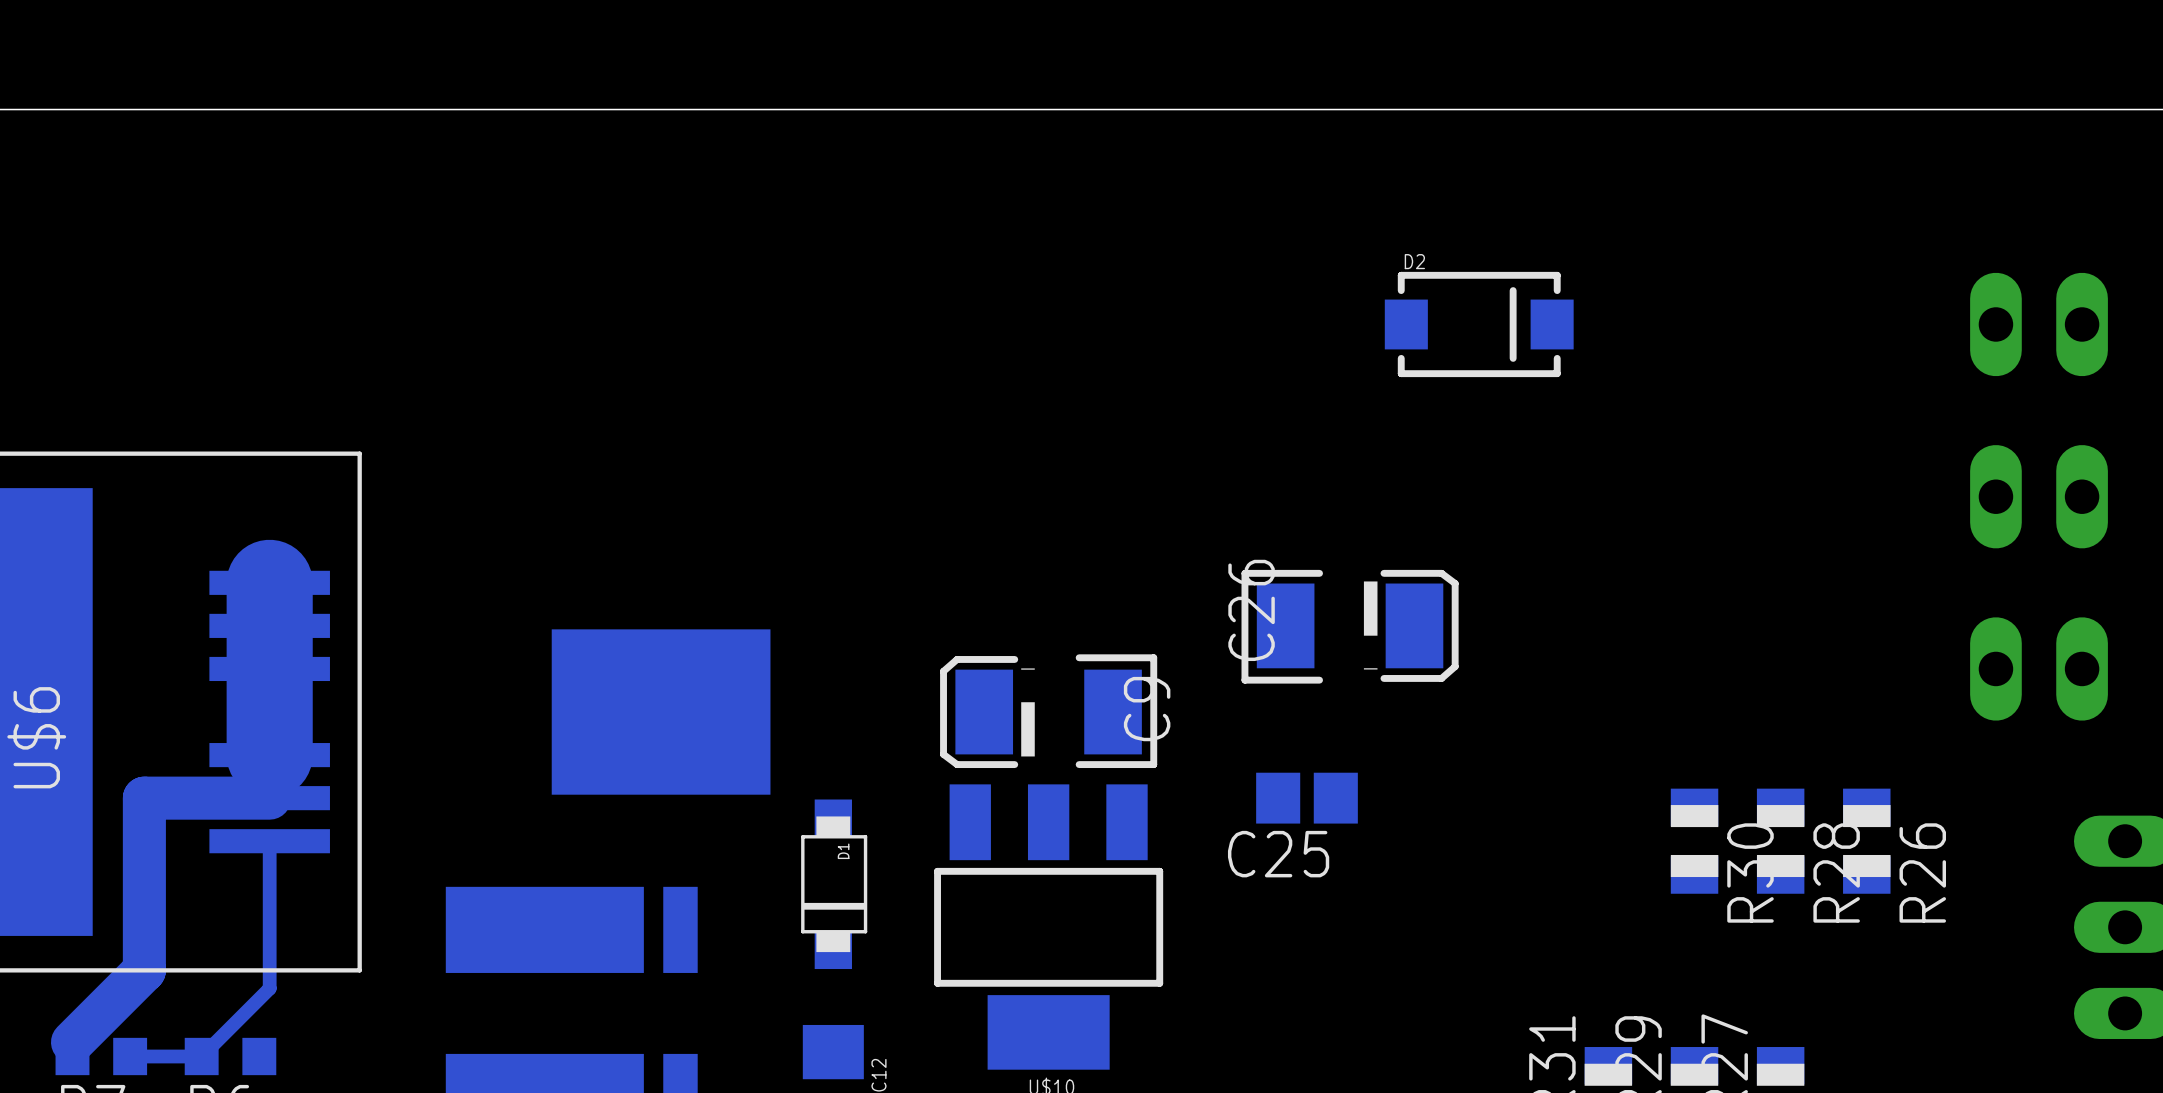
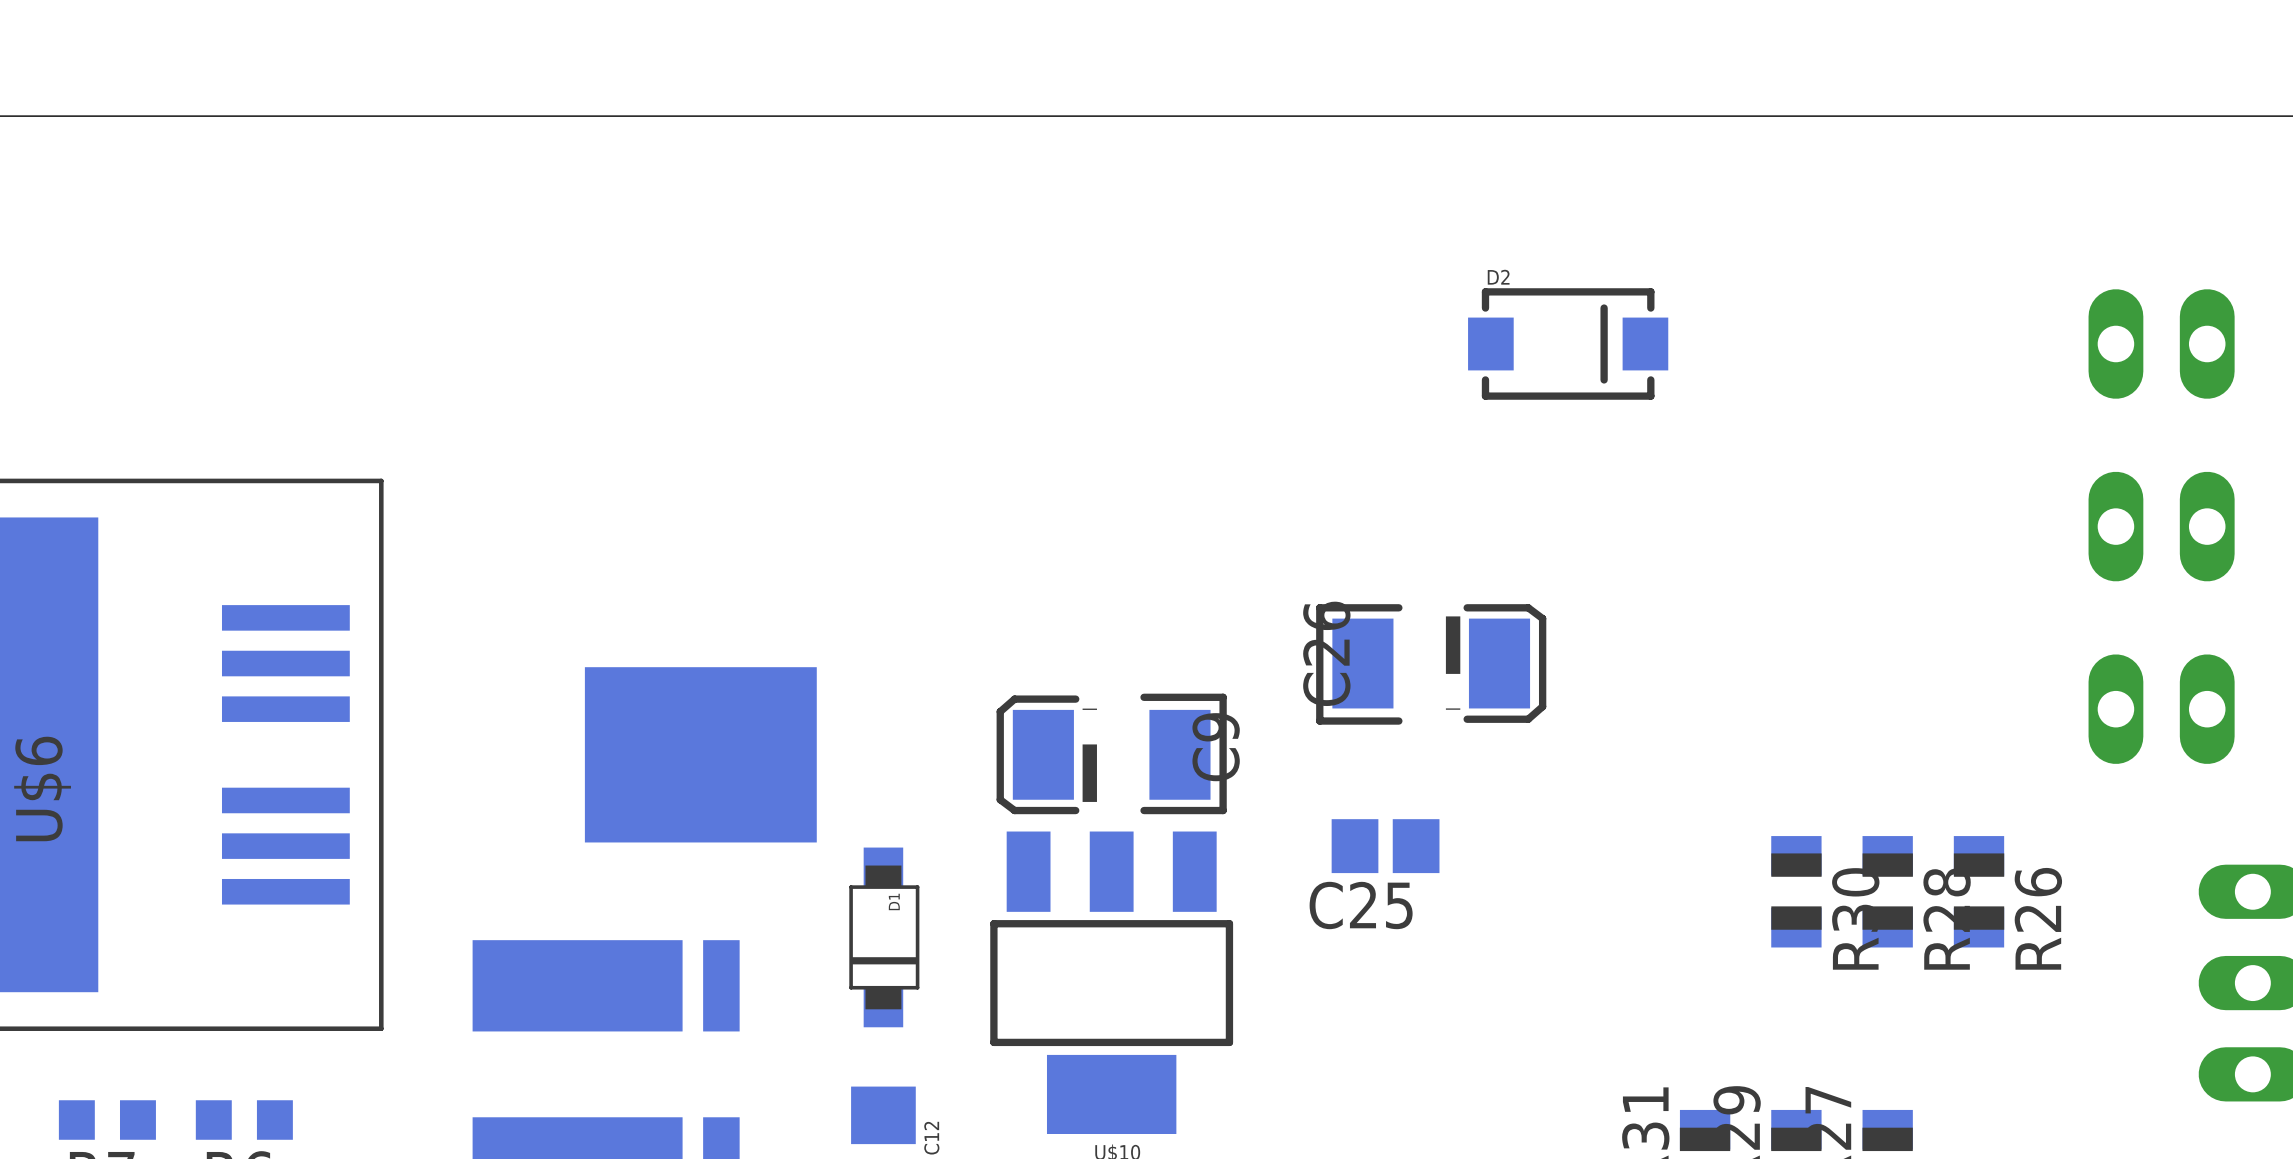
track: (269, 582) (269, 755) -> none
track: (269, 798) (144, 798) (144, 970) (72, 1042) -> none
track: (269, 841) (269, 988) (201, 1056) (144, 1056) -> none

